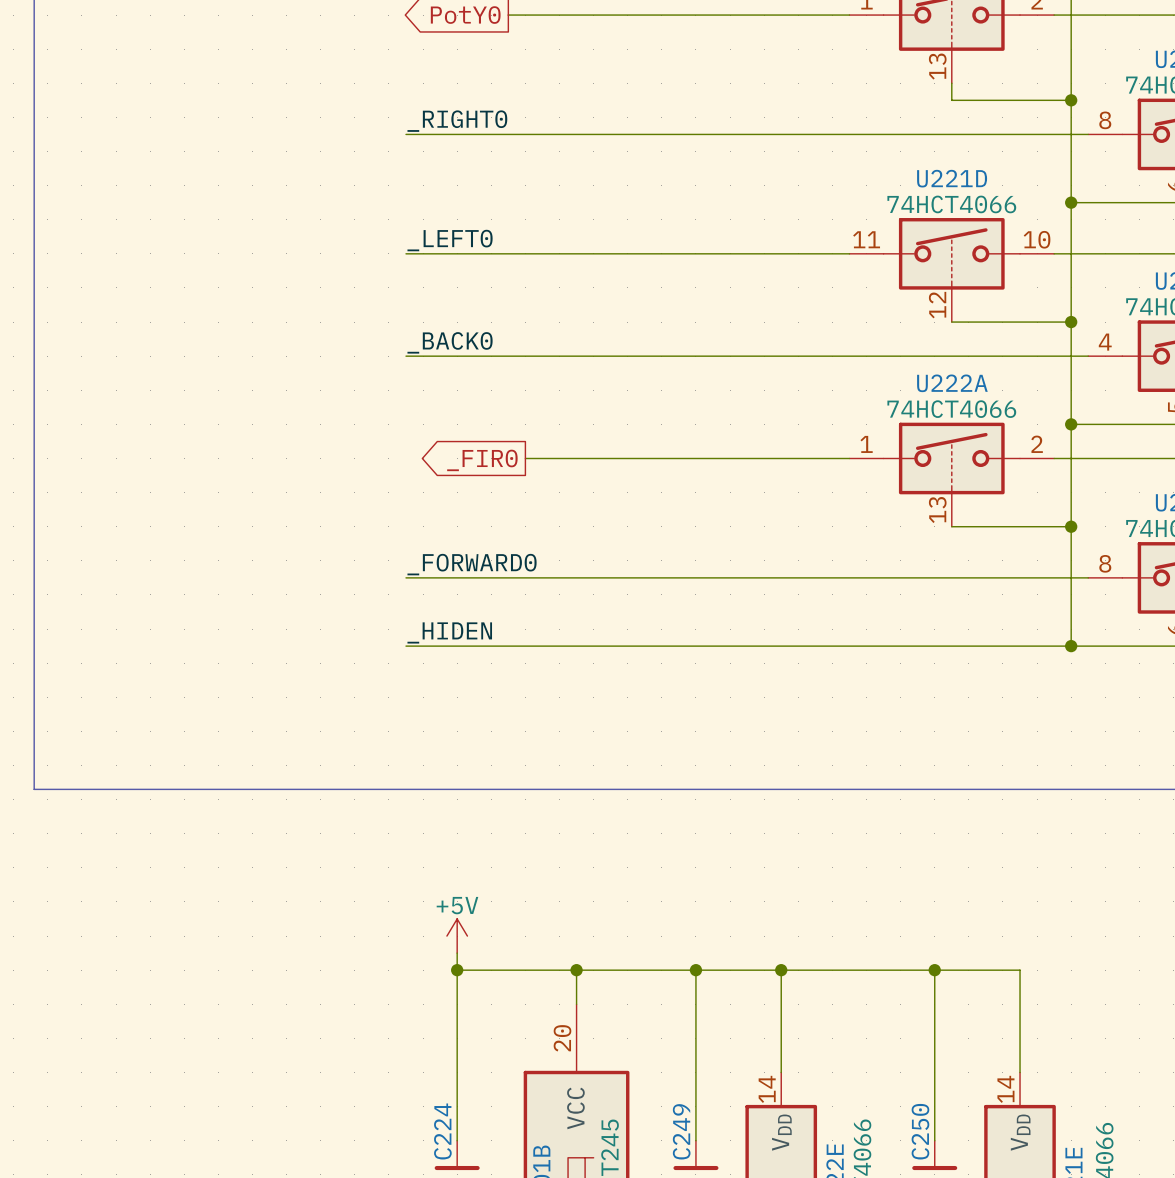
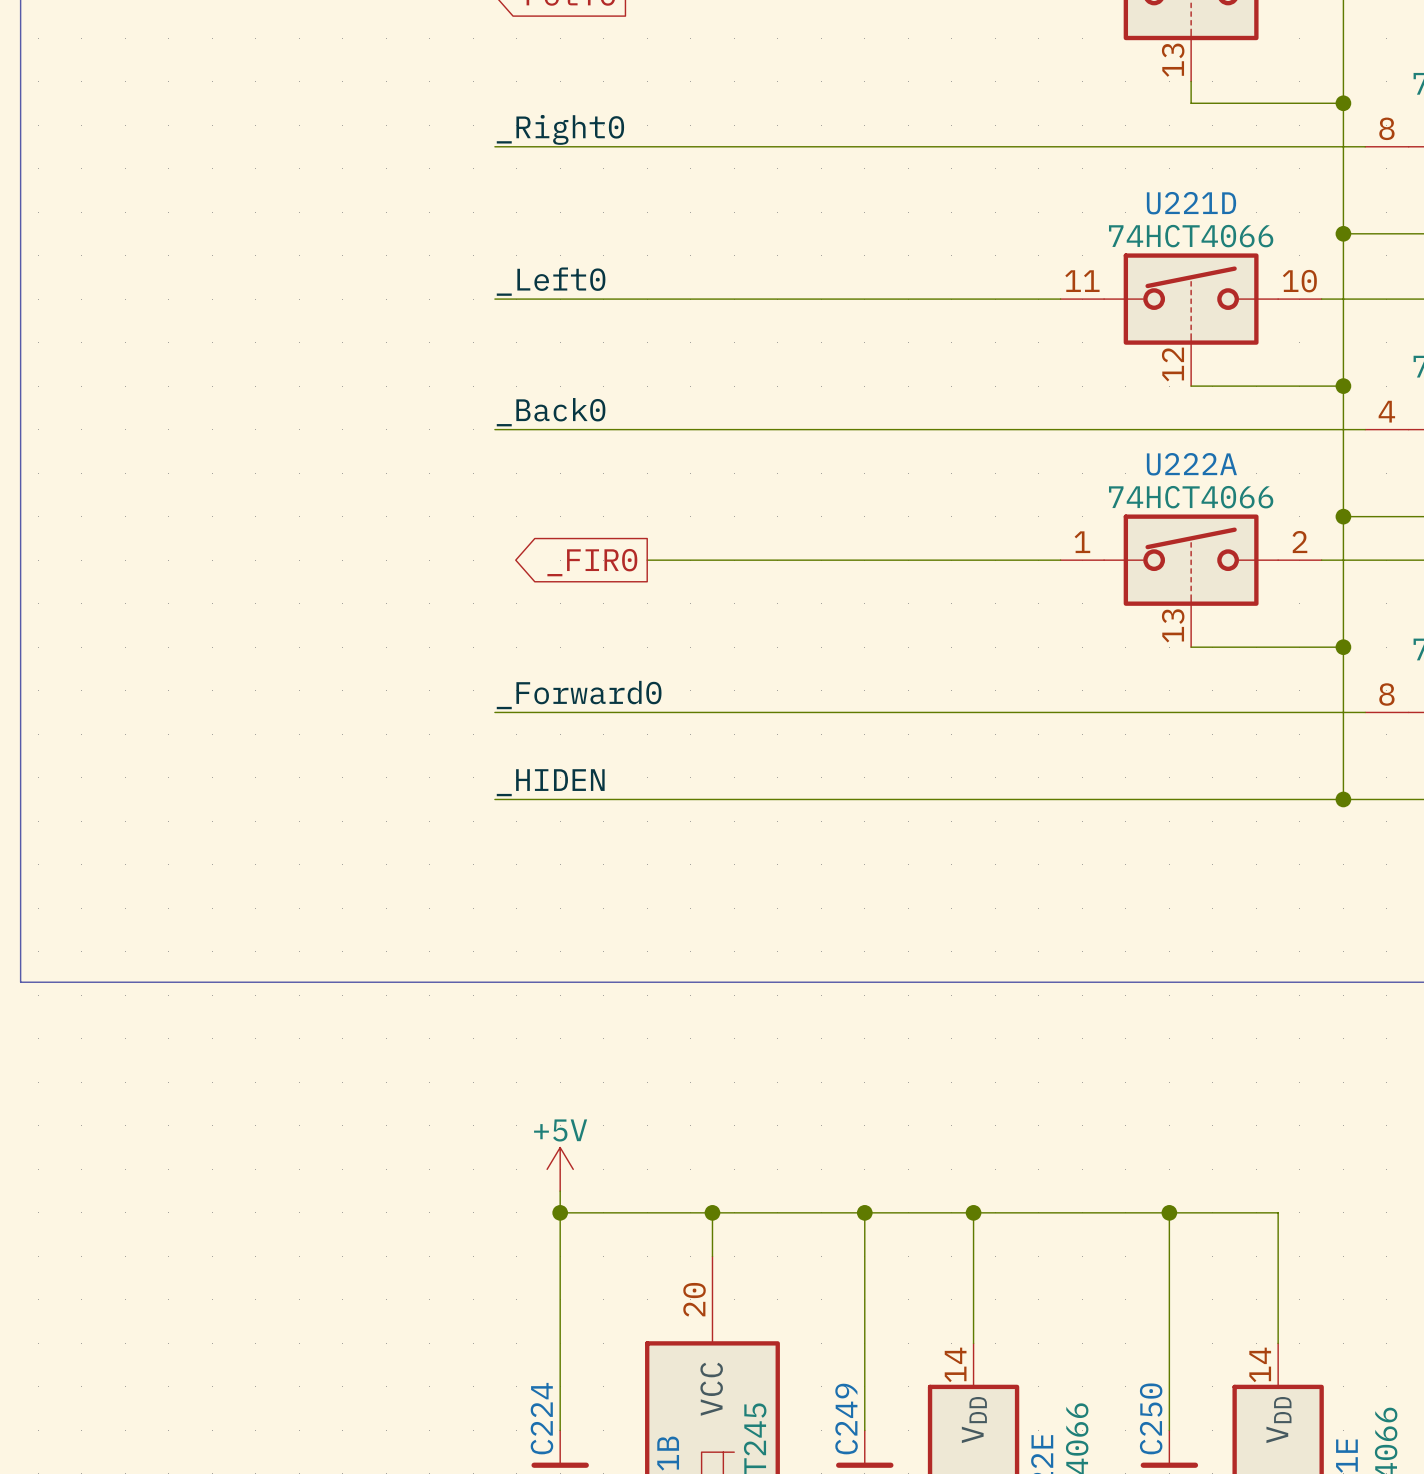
label: _RIGHT0 (457, 121) -> _Right0 (560, 129)
label: _LEFT0 (450, 240) -> _Left0 (551, 281)
label: _BACK0 (450, 342) -> _Back0 (551, 412)
label: _FORWARD0 (472, 564) -> _Forward0 (579, 695)

